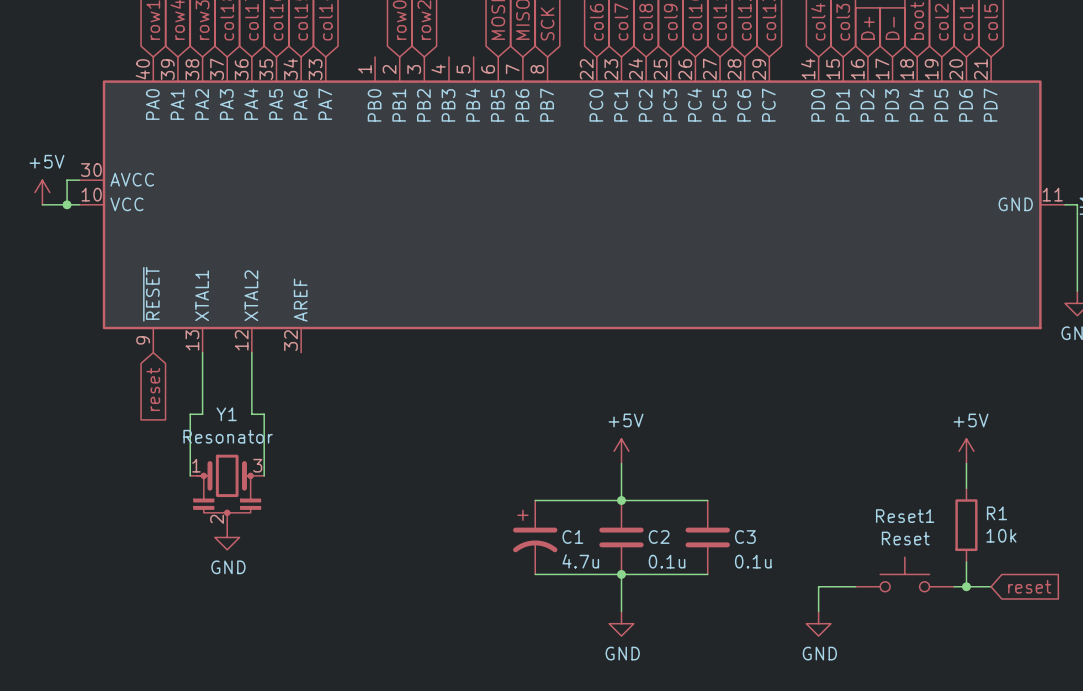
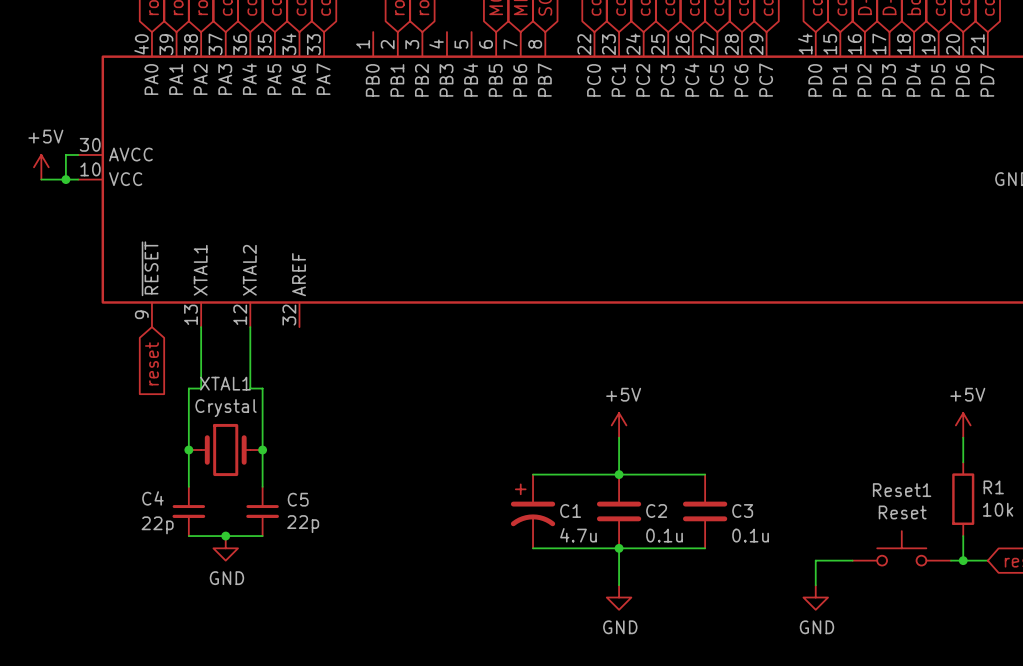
wire: none -> (188, 450) (188, 486)
junction: none -> (188, 450)
XTAL1: none -> Crystal (225, 450)
wire: none -> (262, 450) (262, 486)
junction: none -> (262, 450)
Y1: Resonator (227, 489) -> none
C4: none -> 22p (188, 511)
power symbol position: GND (227, 537) -> GND (225, 548)
C5: none -> 22p (262, 511)
wire: none -> (188, 536) (262, 536)
junction: none -> (225, 536)

